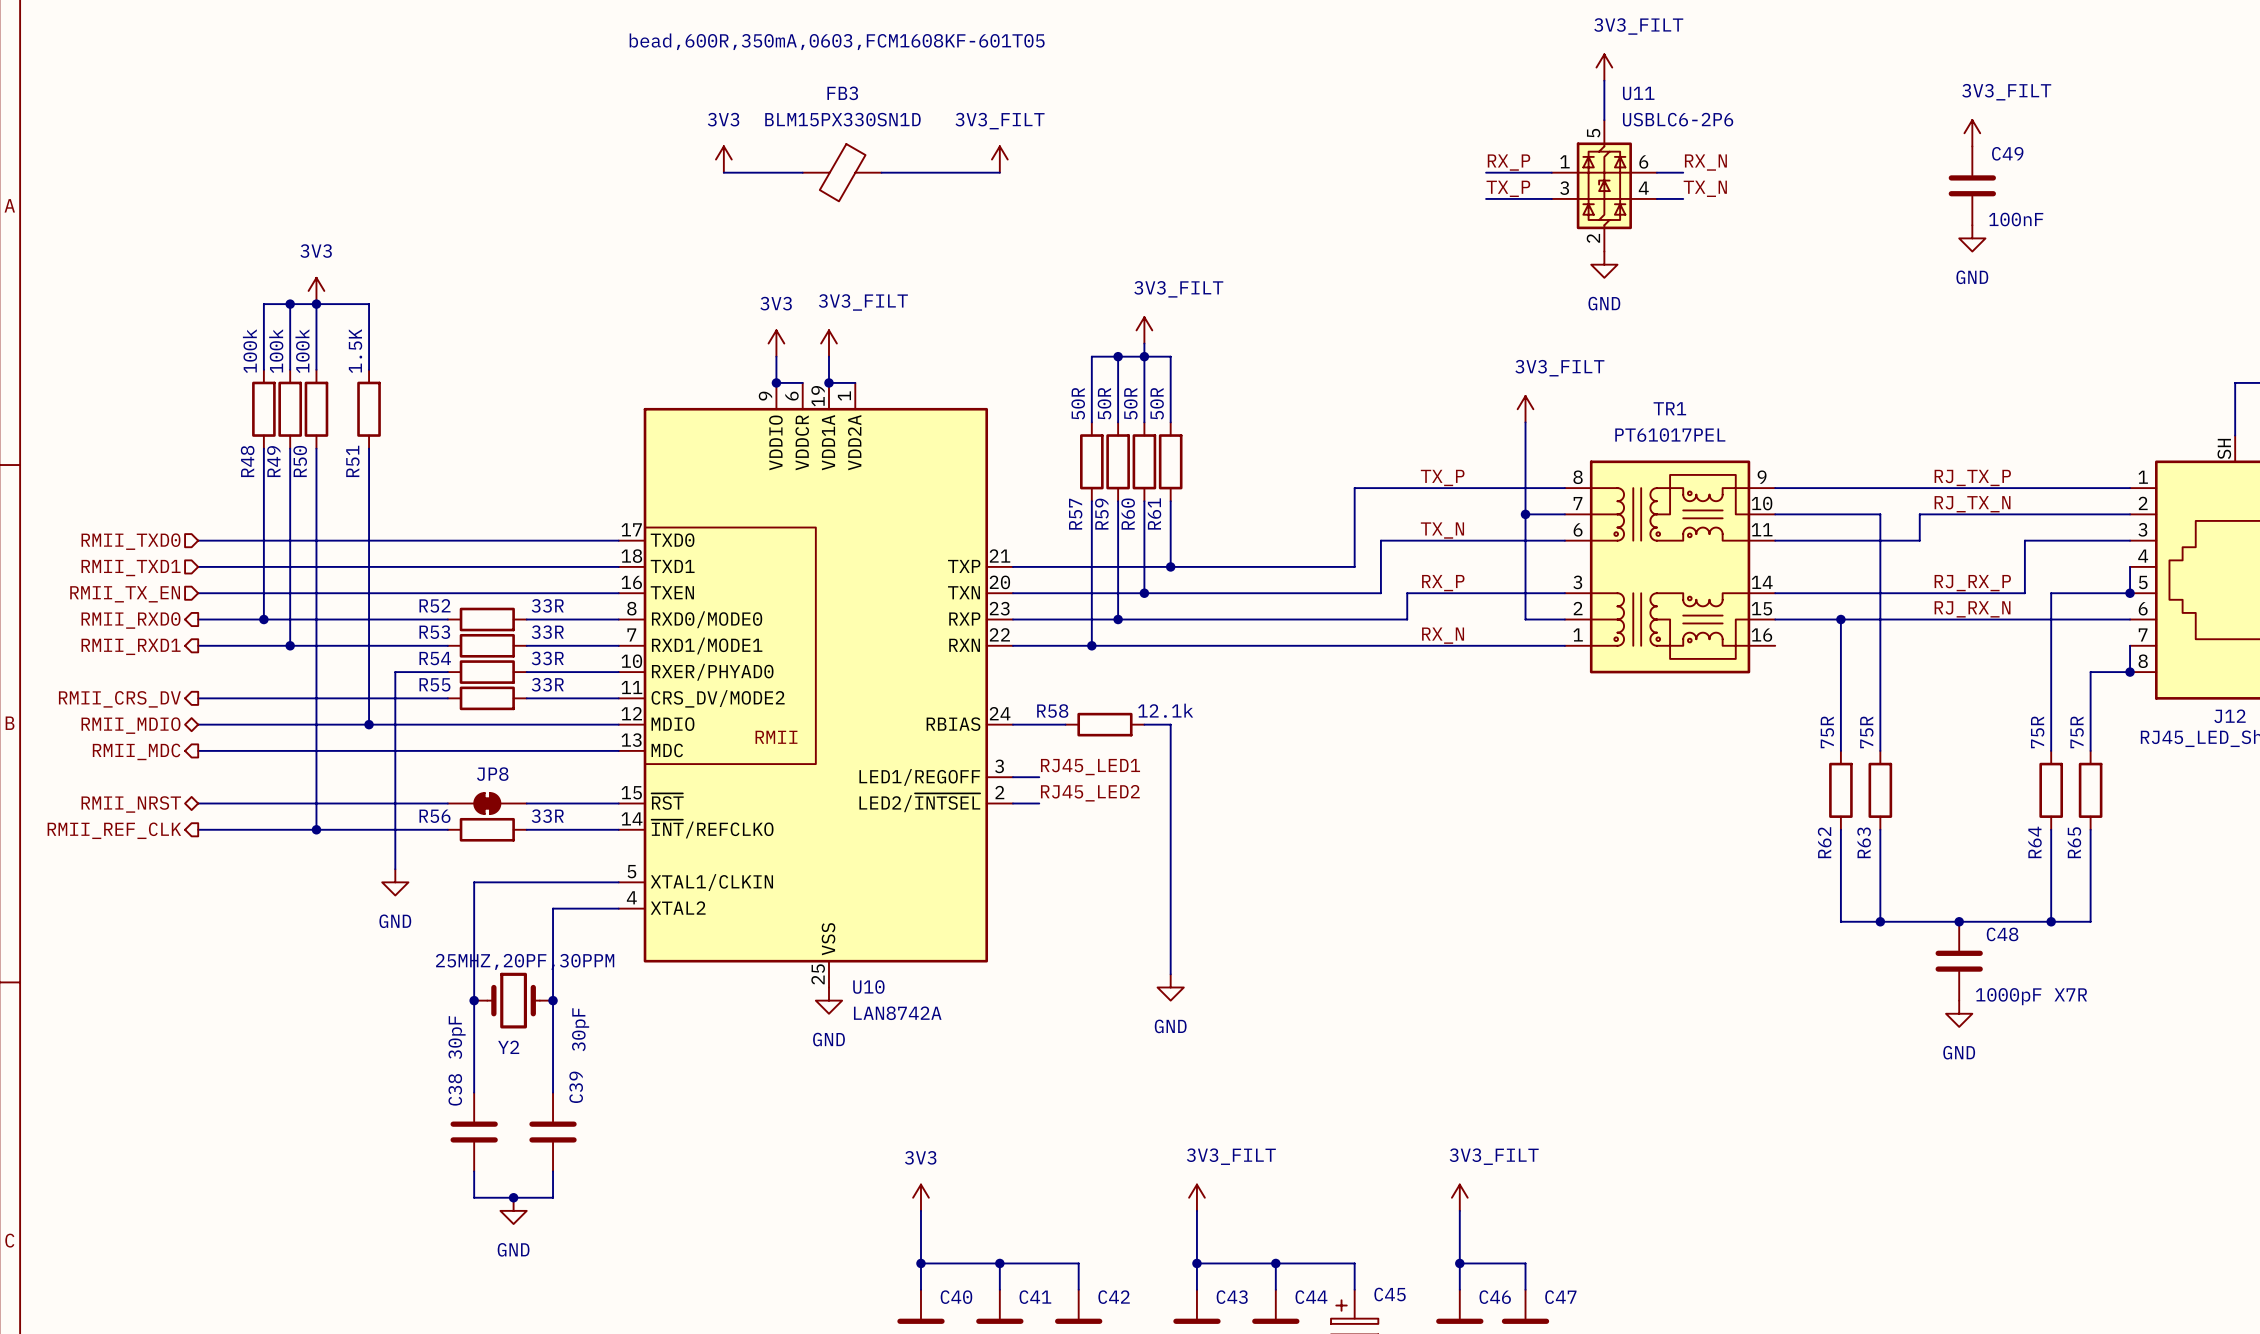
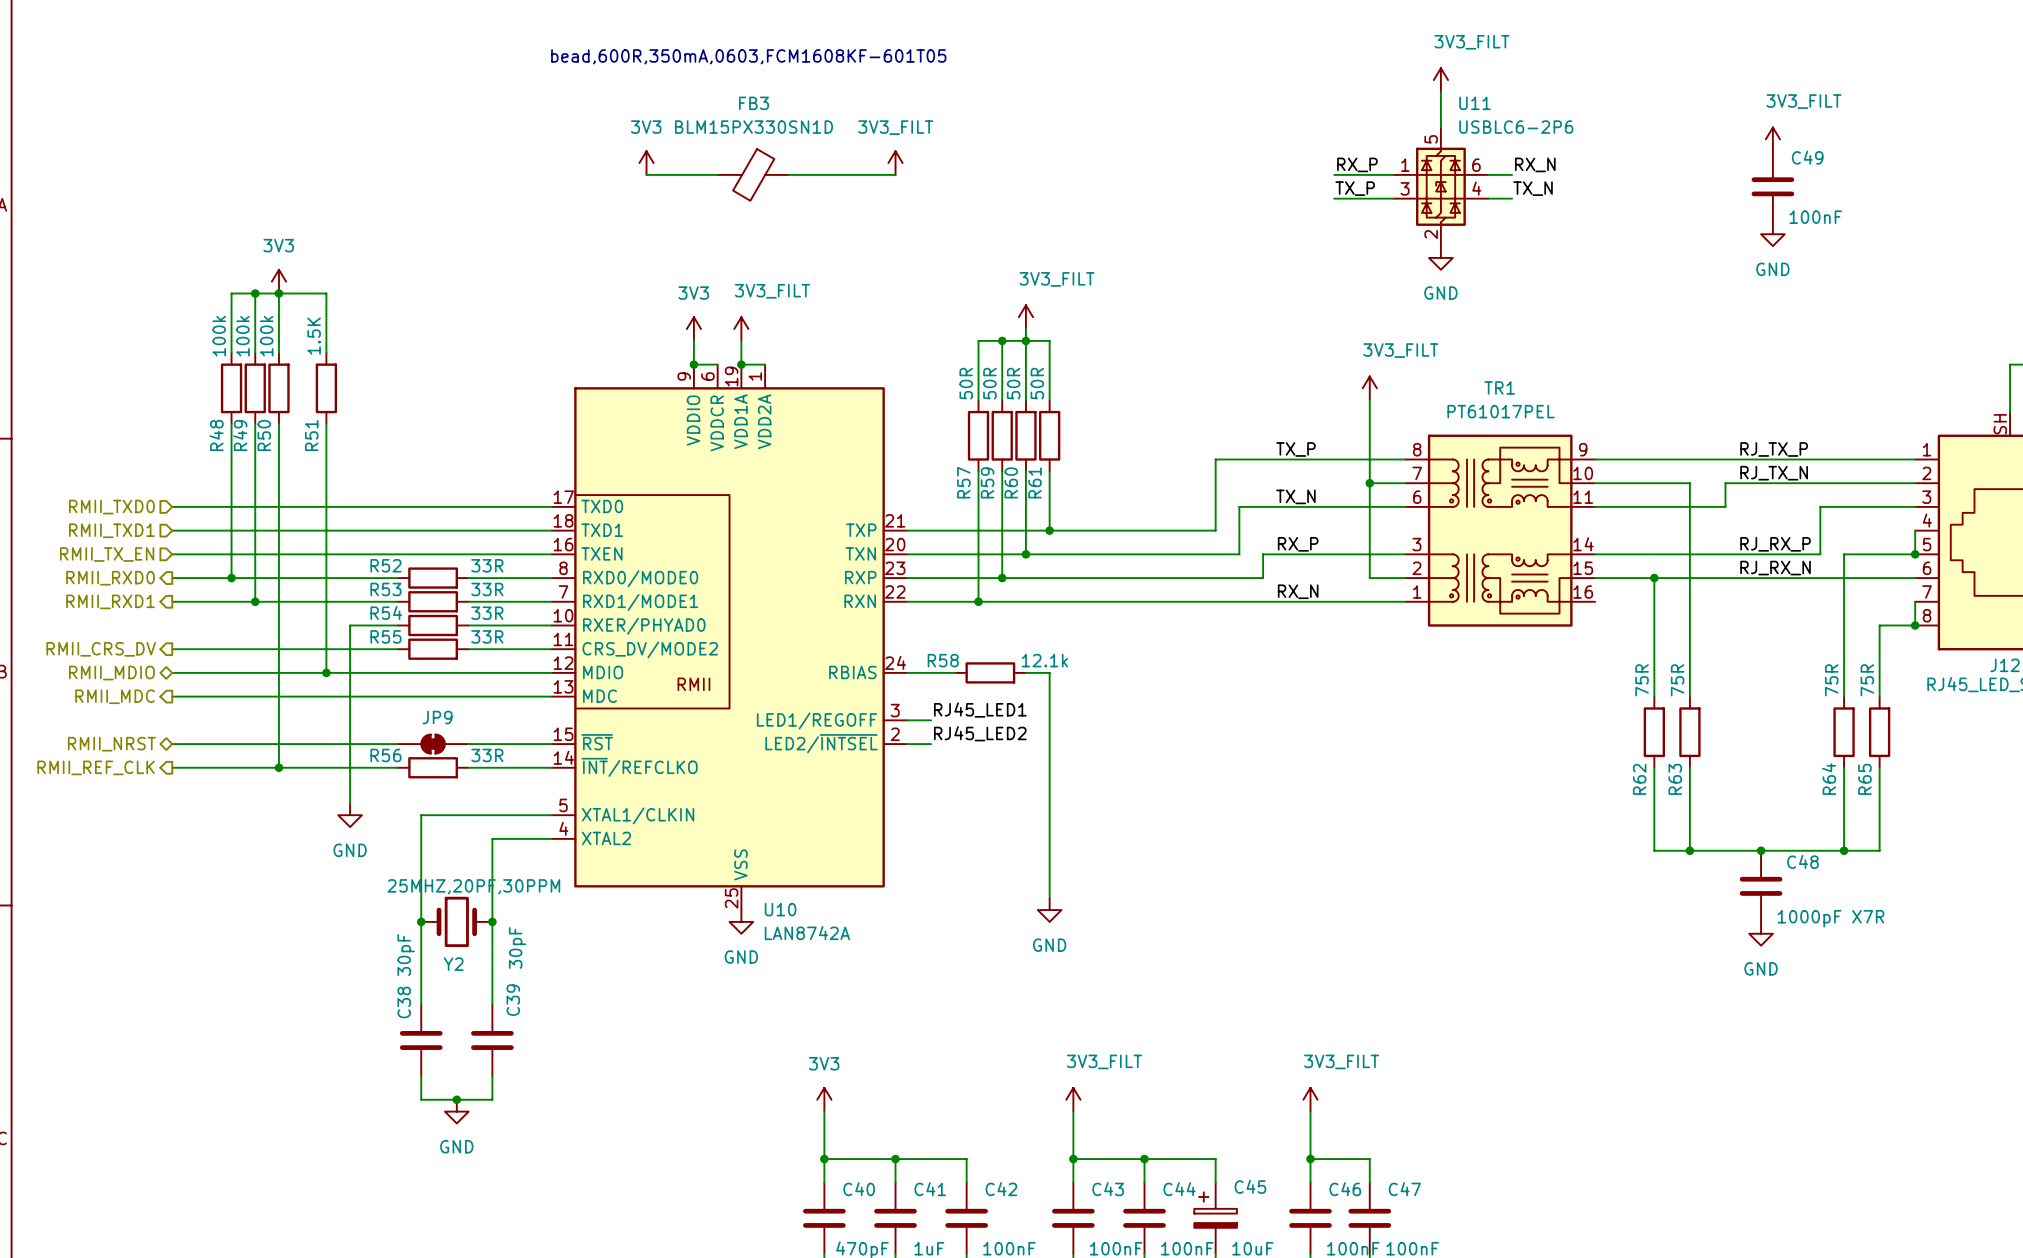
JP8 name: JP8 (492, 774) -> JP9 (437, 717)

